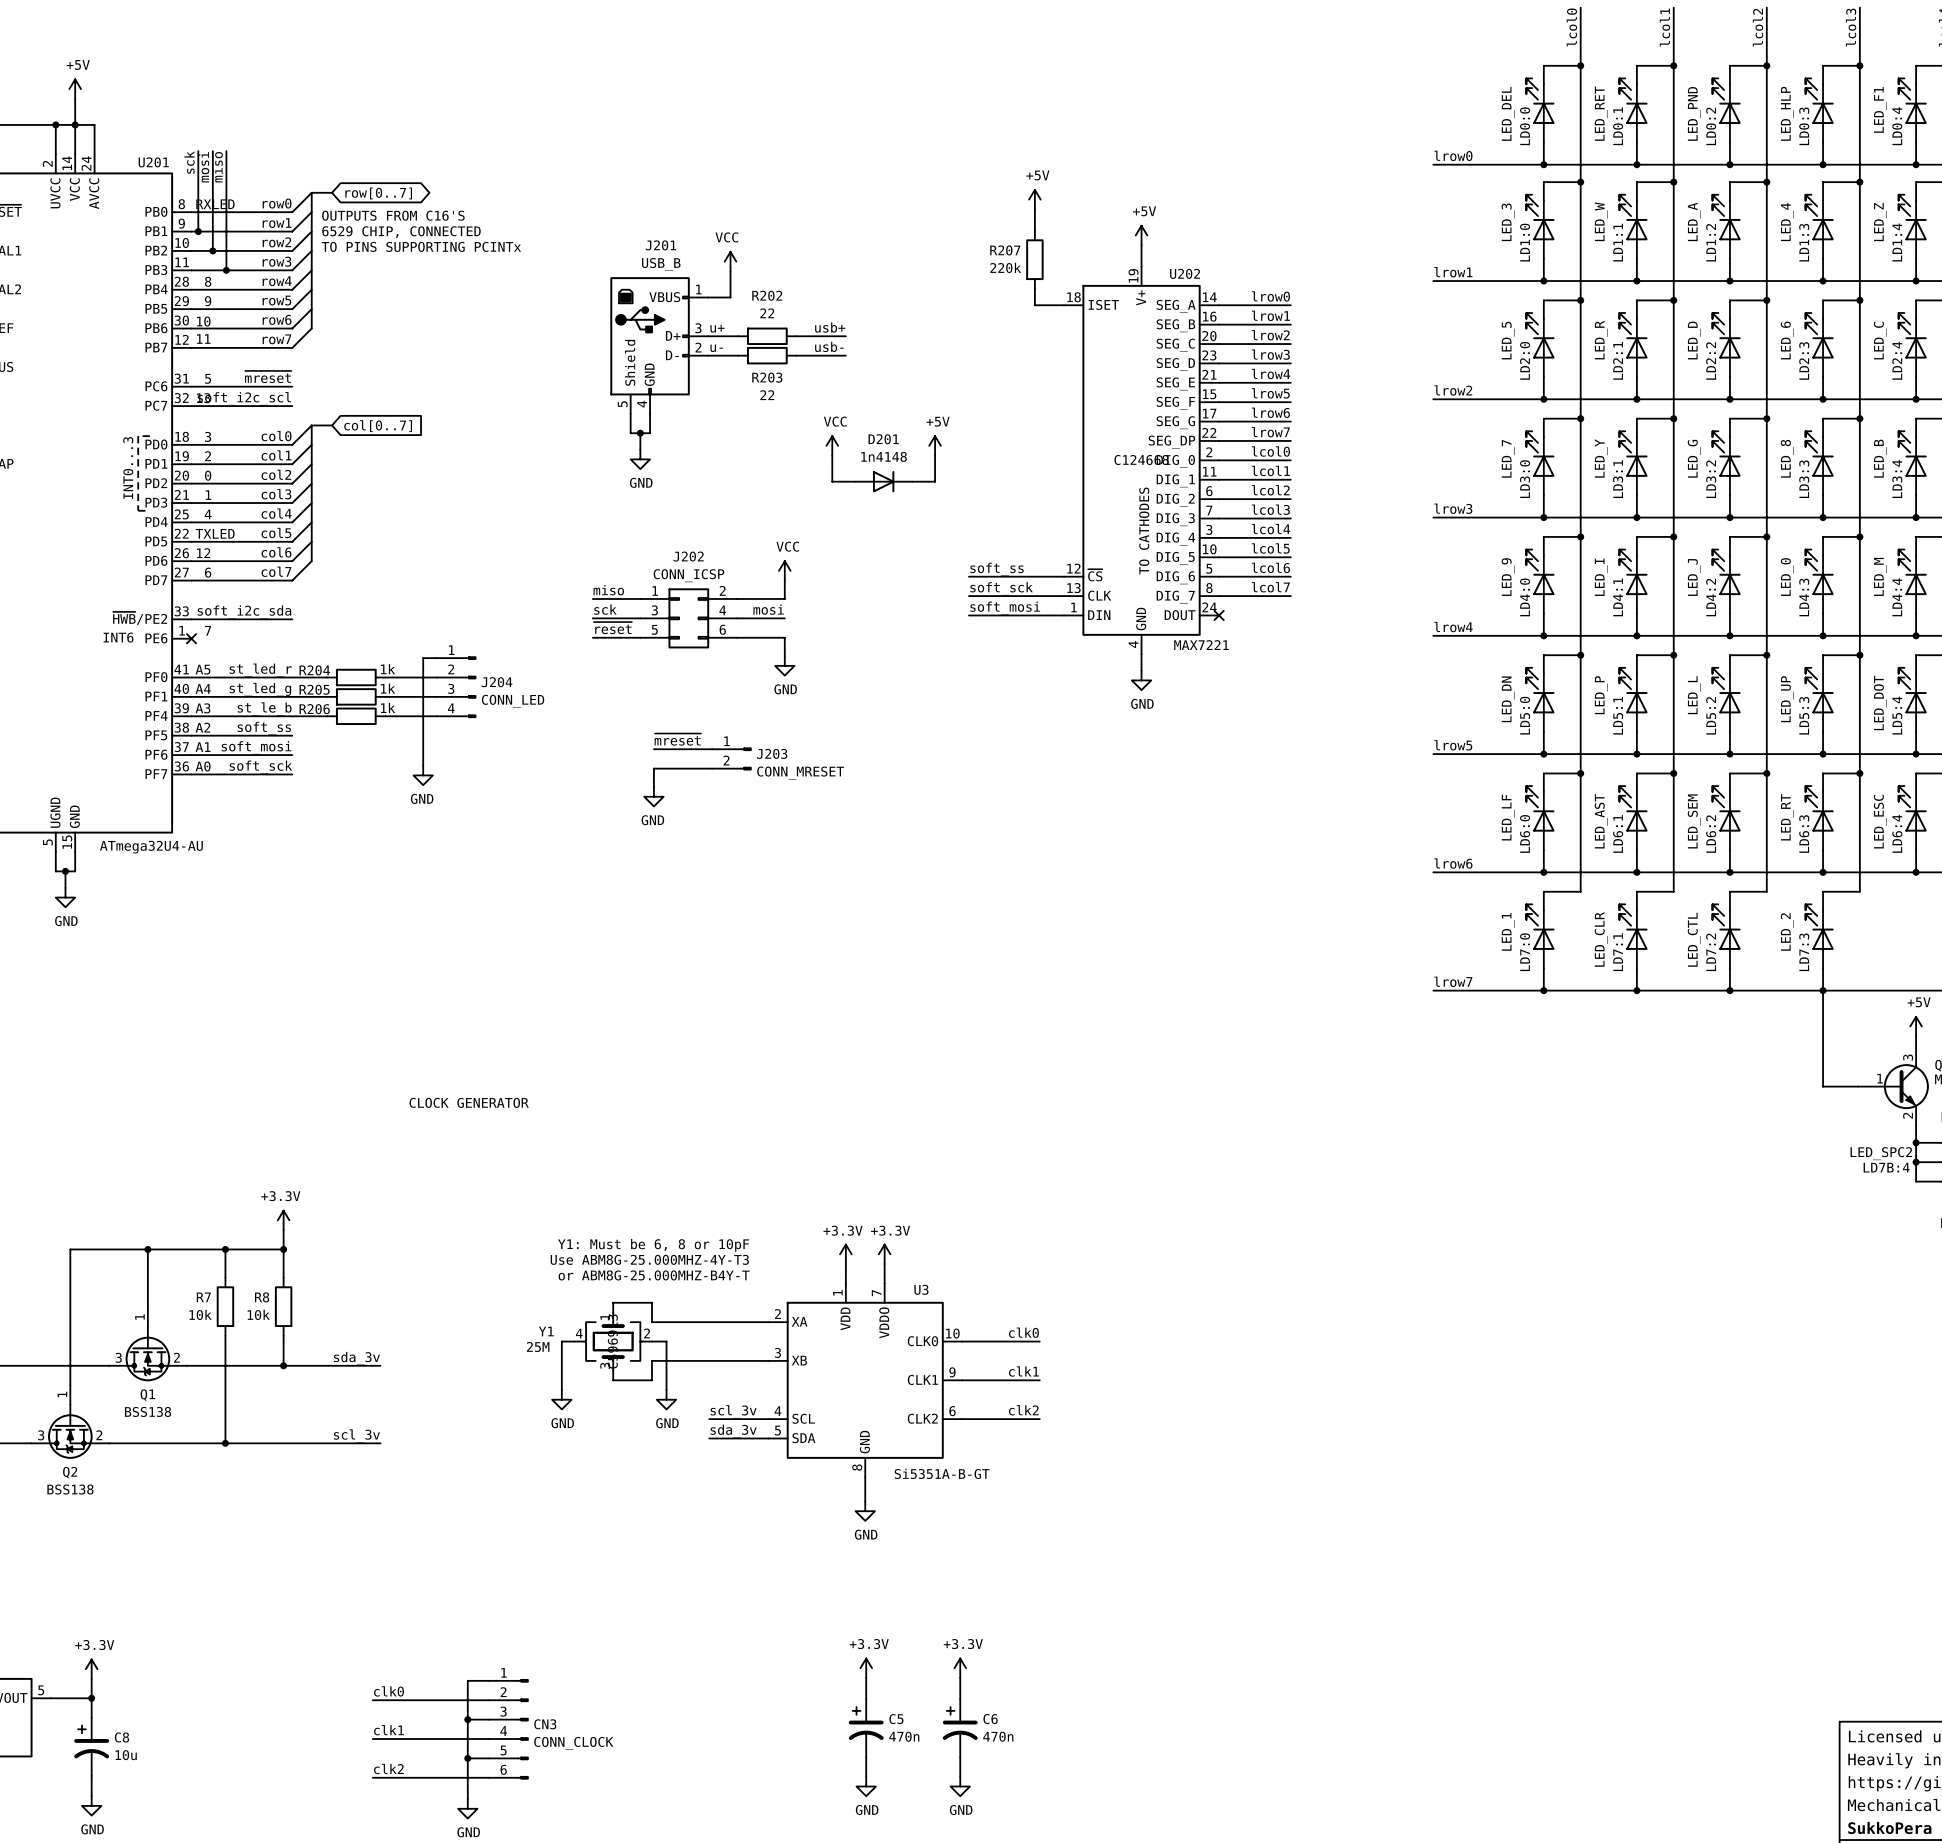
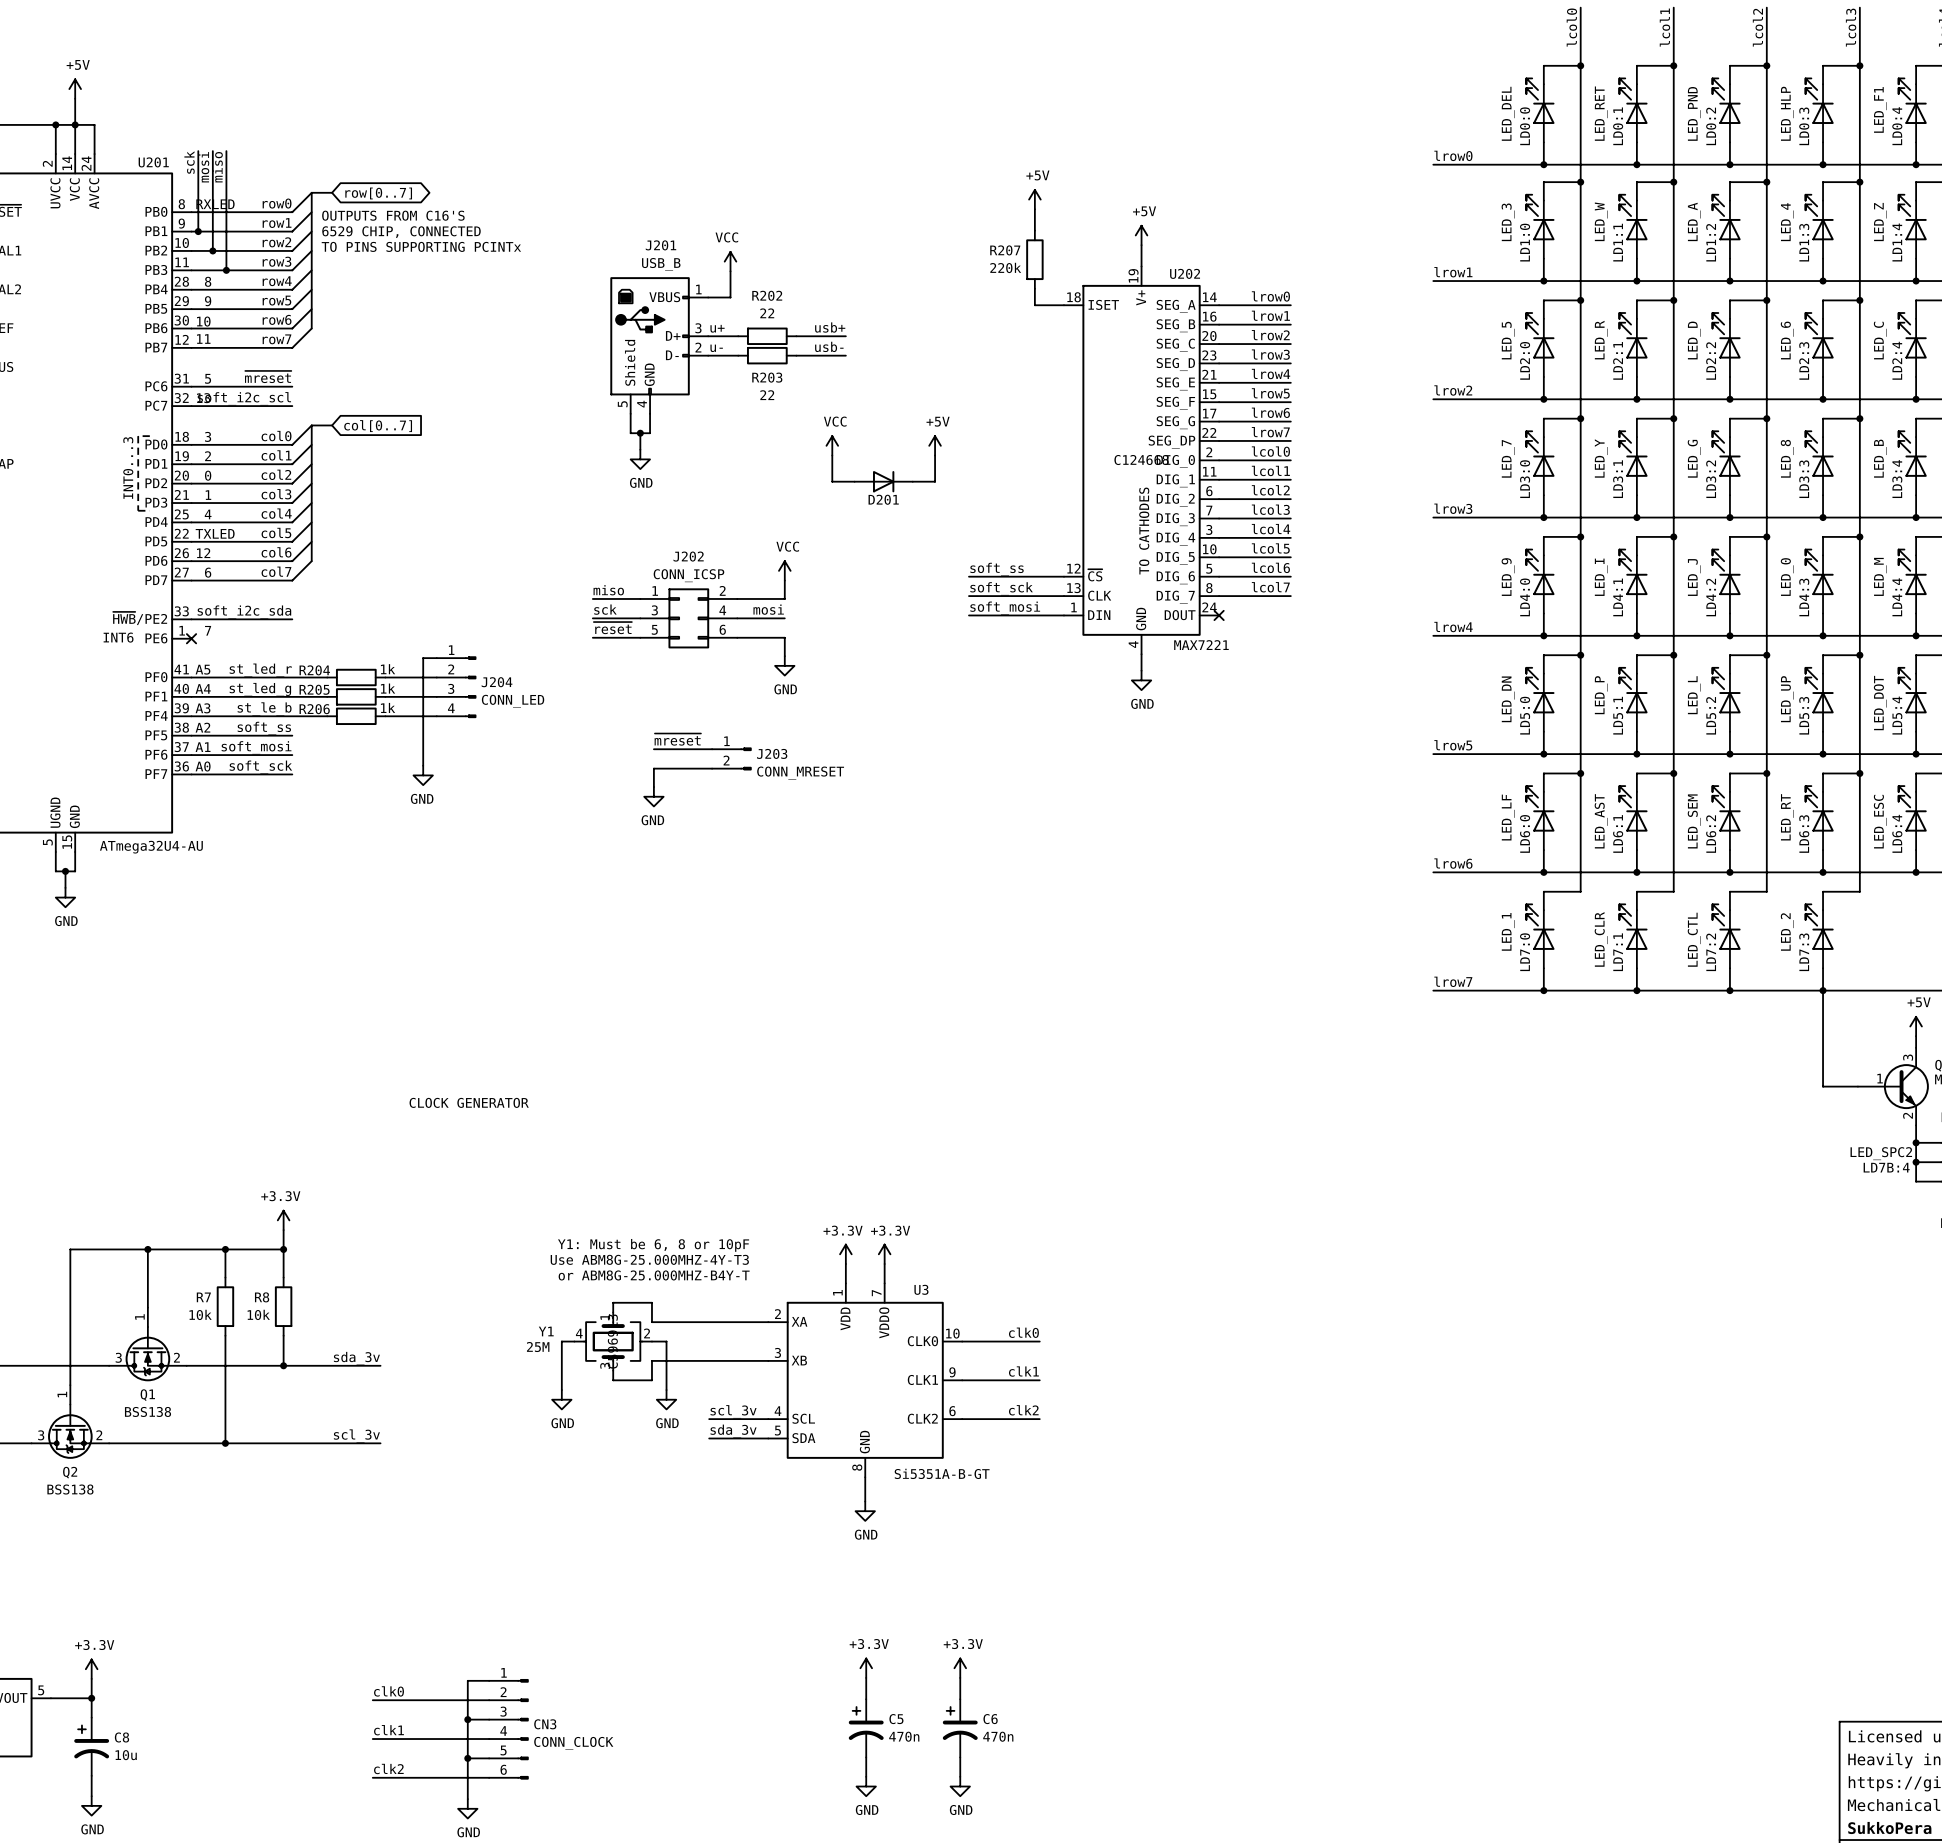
D201 name position: D201 (883, 439) -> D201 (883, 499)
D201 value: 1n4148 (884, 456) -> none

